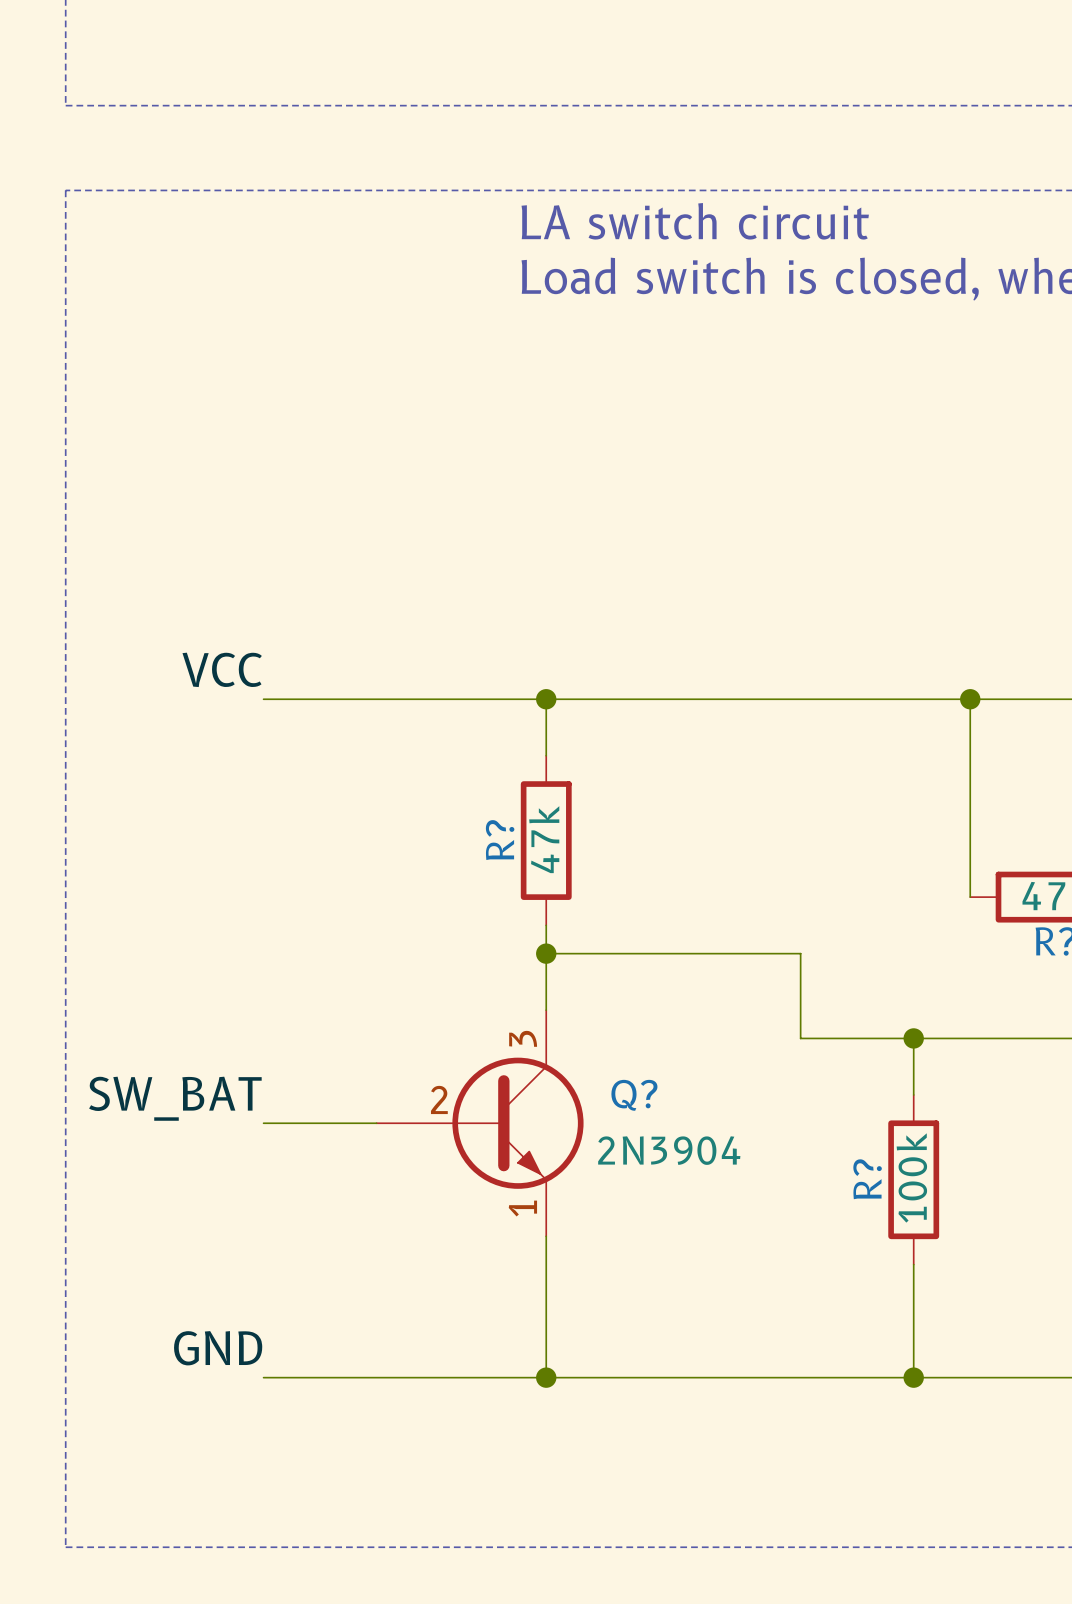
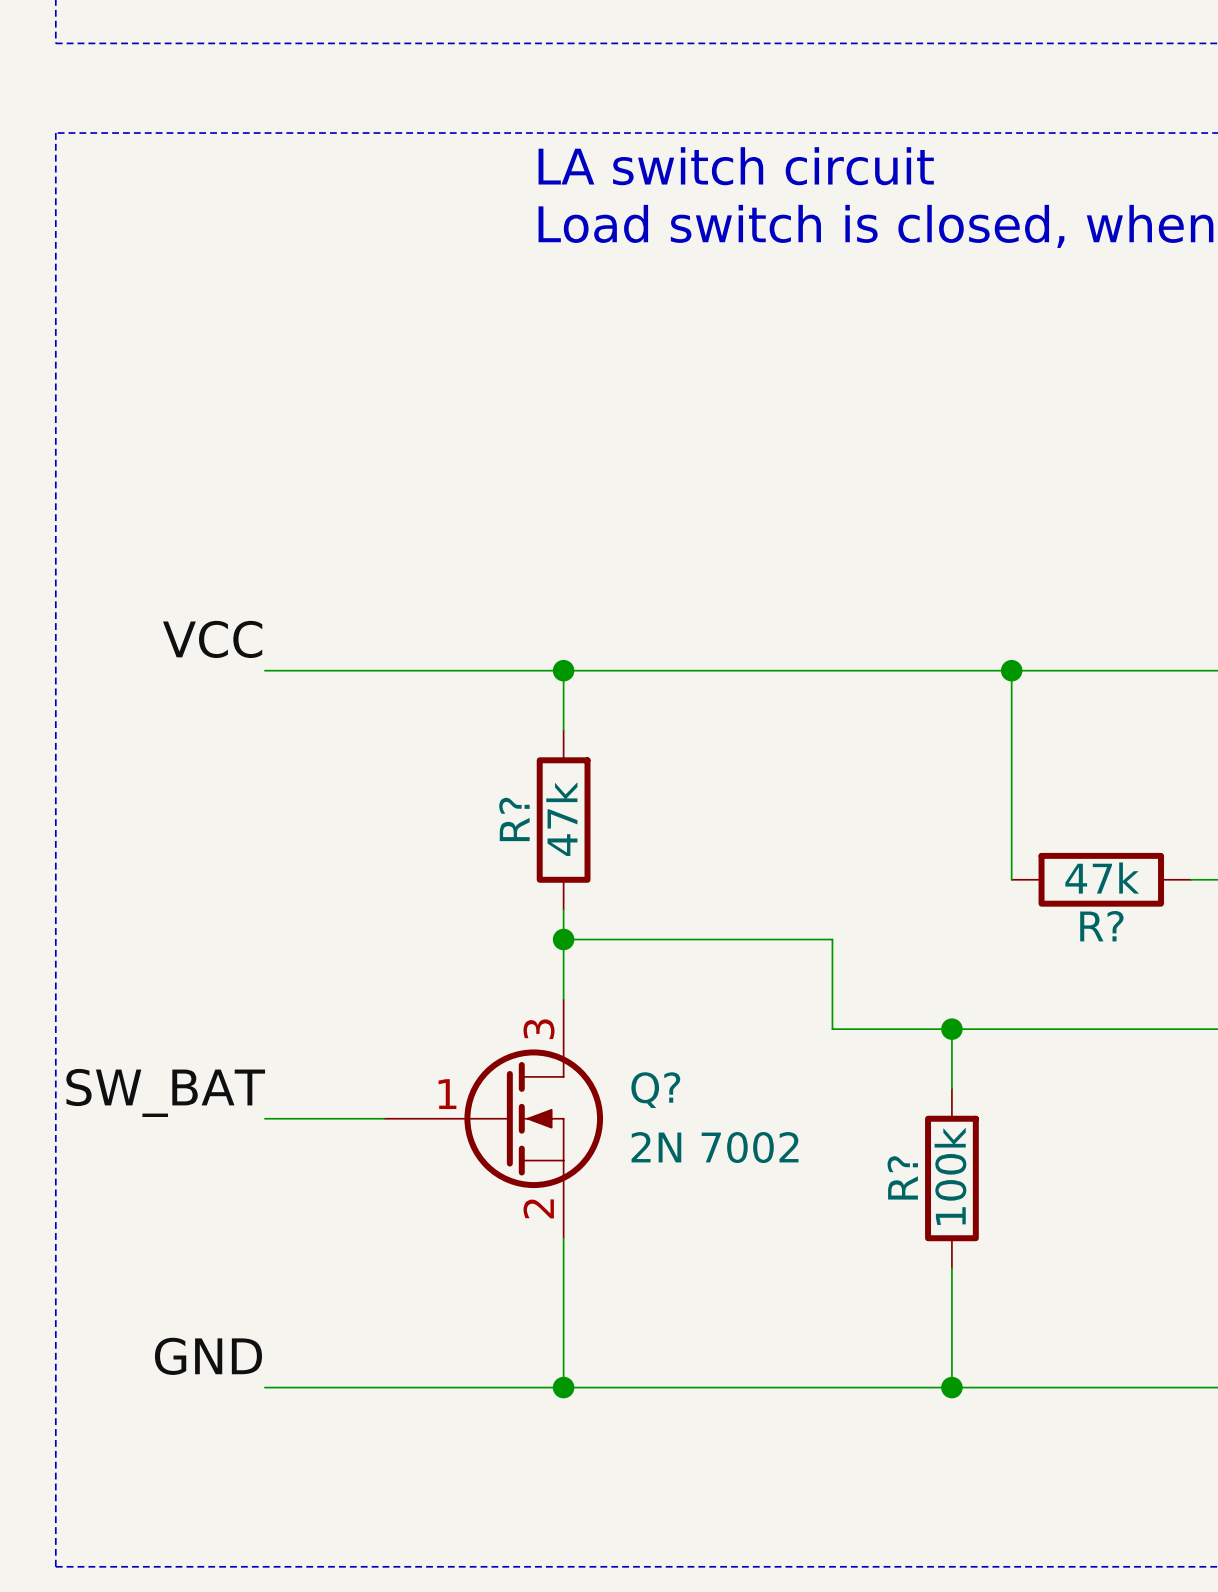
Q? symbol: [376, 1010, 584, 1237] -> [384, 999, 604, 1239]
Q? value: 2N3904 (669, 1150) -> 2N 7002 (715, 1147)

